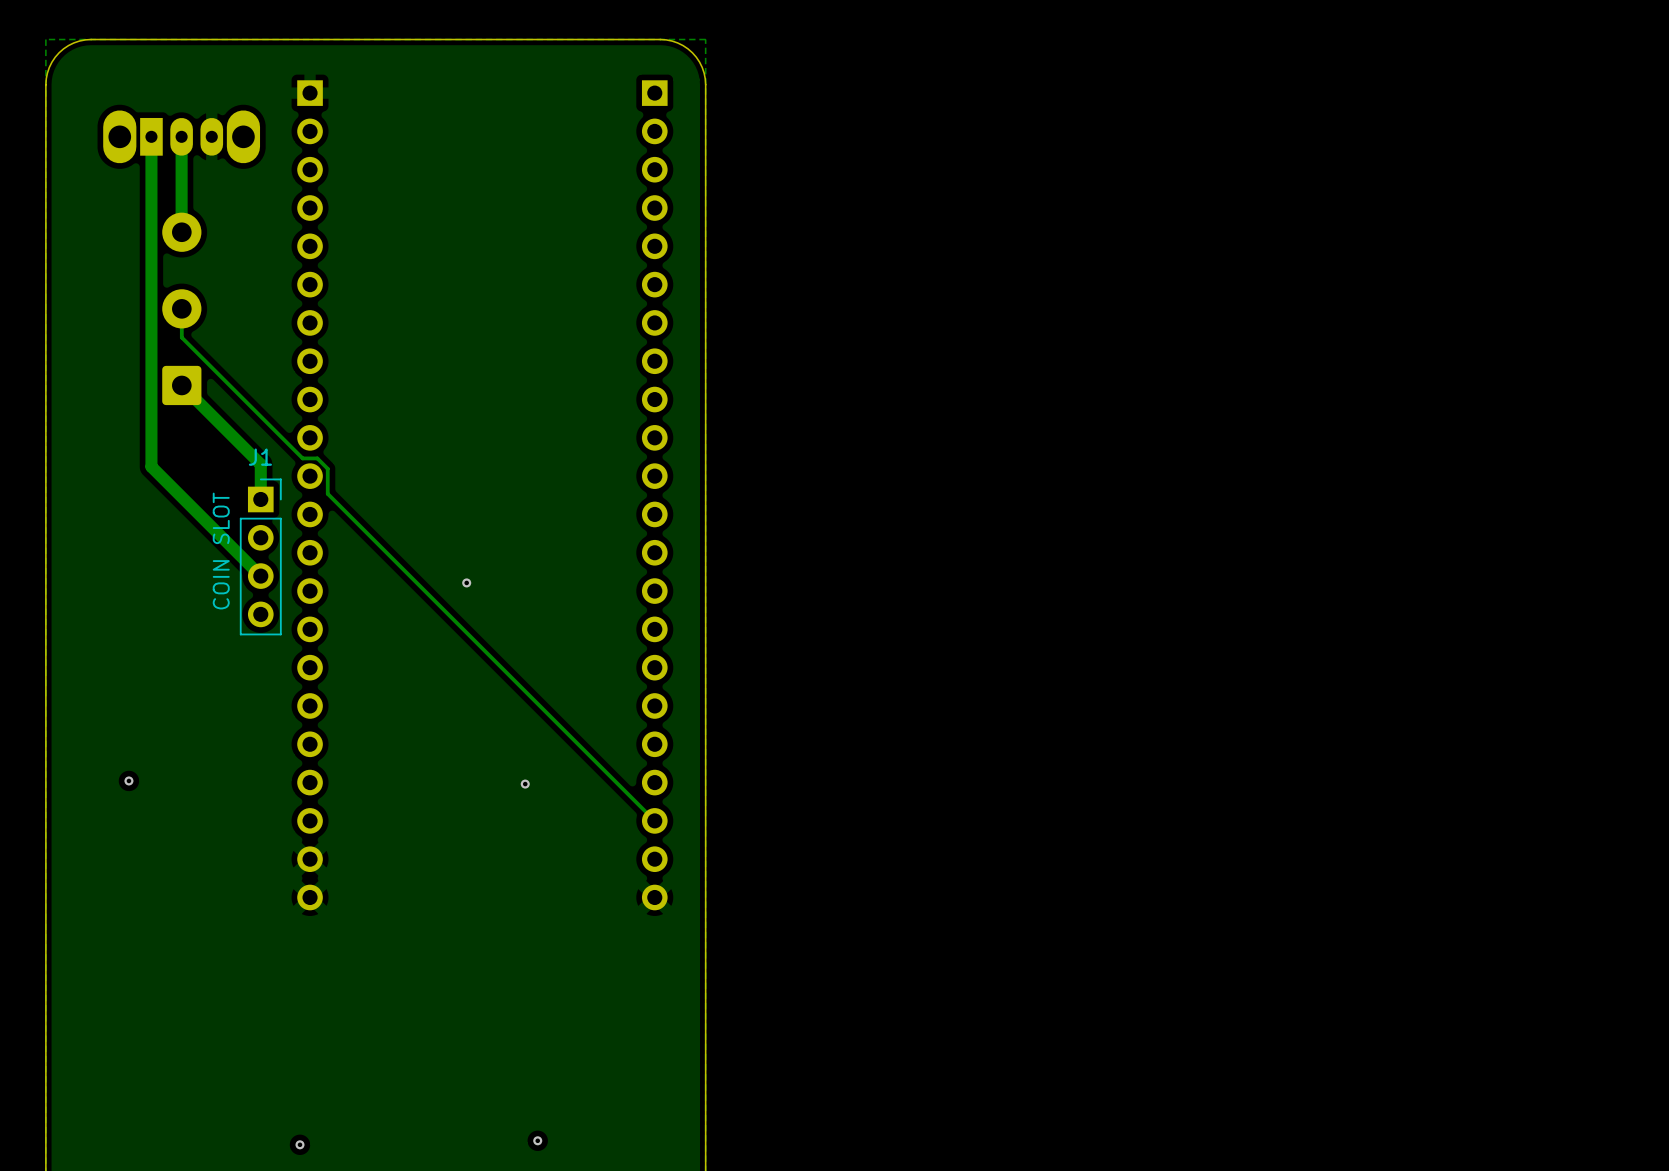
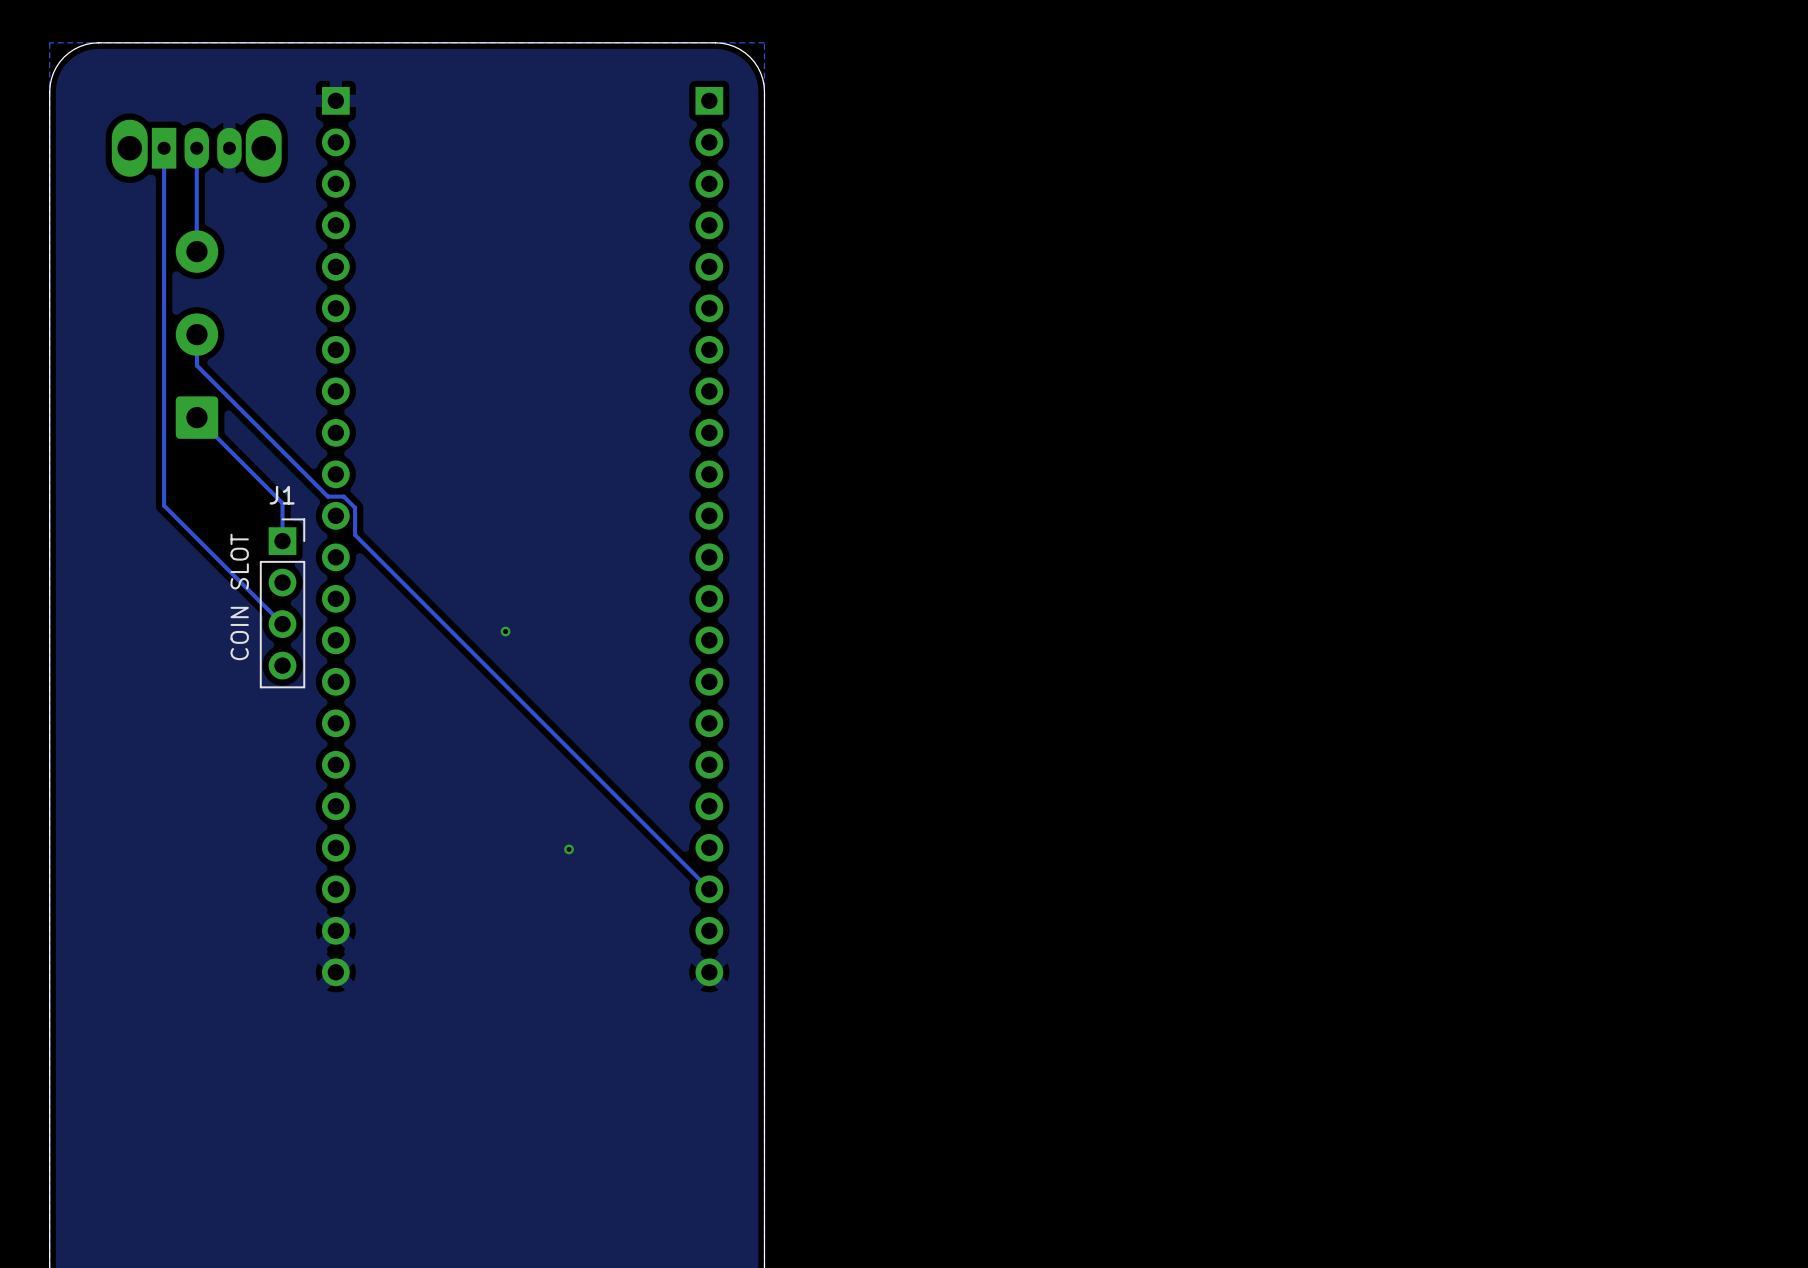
track width: thick (151, 136) (151, 466) (260, 576) -> thin (164, 148) (164, 505) (282, 624)
track width: thick (181, 136) (181, 232) -> thin (196, 148) (196, 251)
track width: thick (181, 385) (260, 464) (260, 499) -> thin (196, 417) (282, 503) (282, 541)
via: (128, 780) -> none
via: (537, 1140) -> none
via: (299, 1144) -> none

